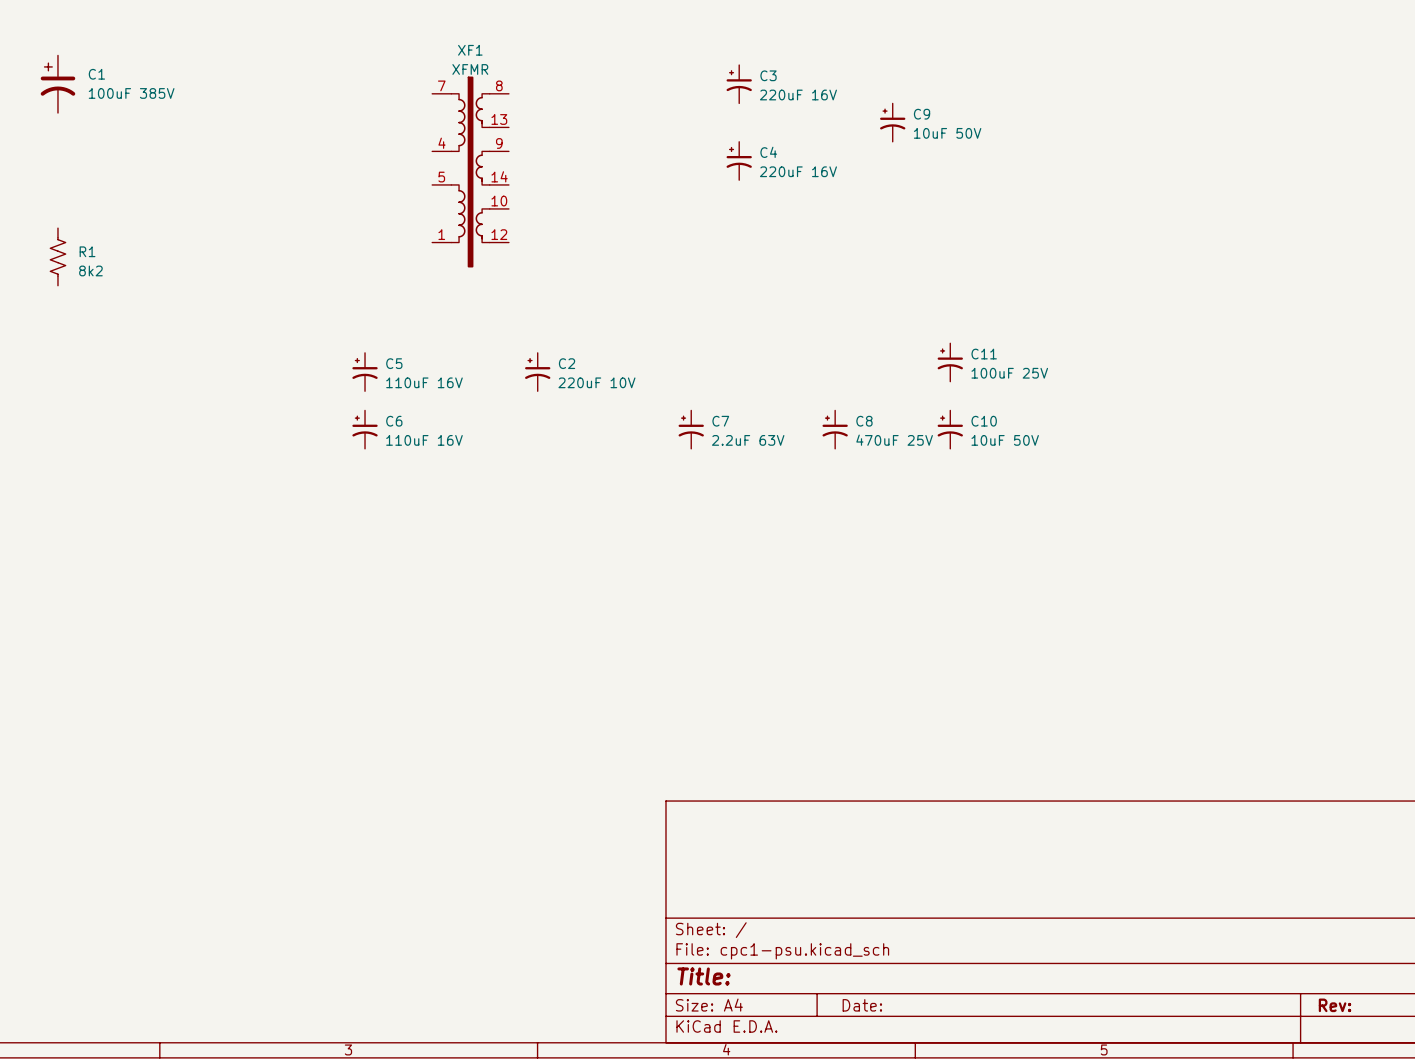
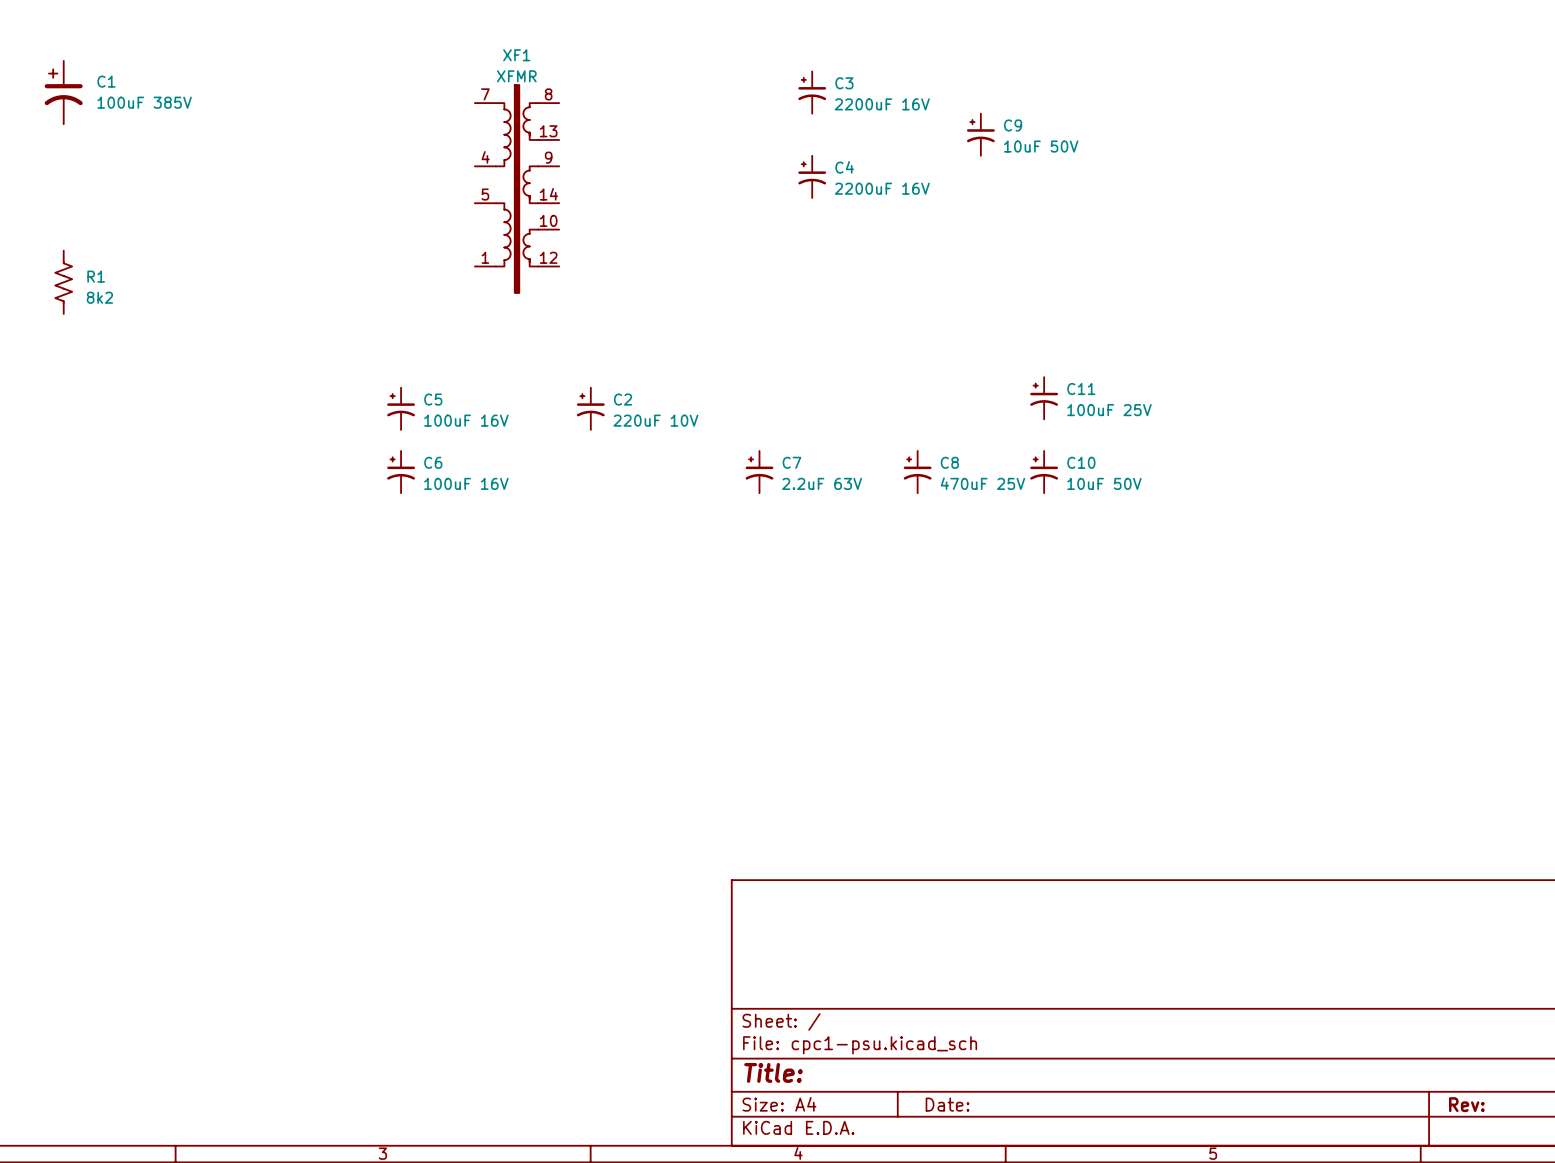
C3 value: 220uF 16V (798, 94) -> 2200uF 16V (882, 104)
C4 value: 220uF 16V (798, 171) -> 2200uF 16V (882, 188)
C5 value: 110uF 16V (424, 382) -> 100uF 16V (466, 420)
C6 value: 110uF 16V (424, 440) -> 100uF 16V (466, 483)

